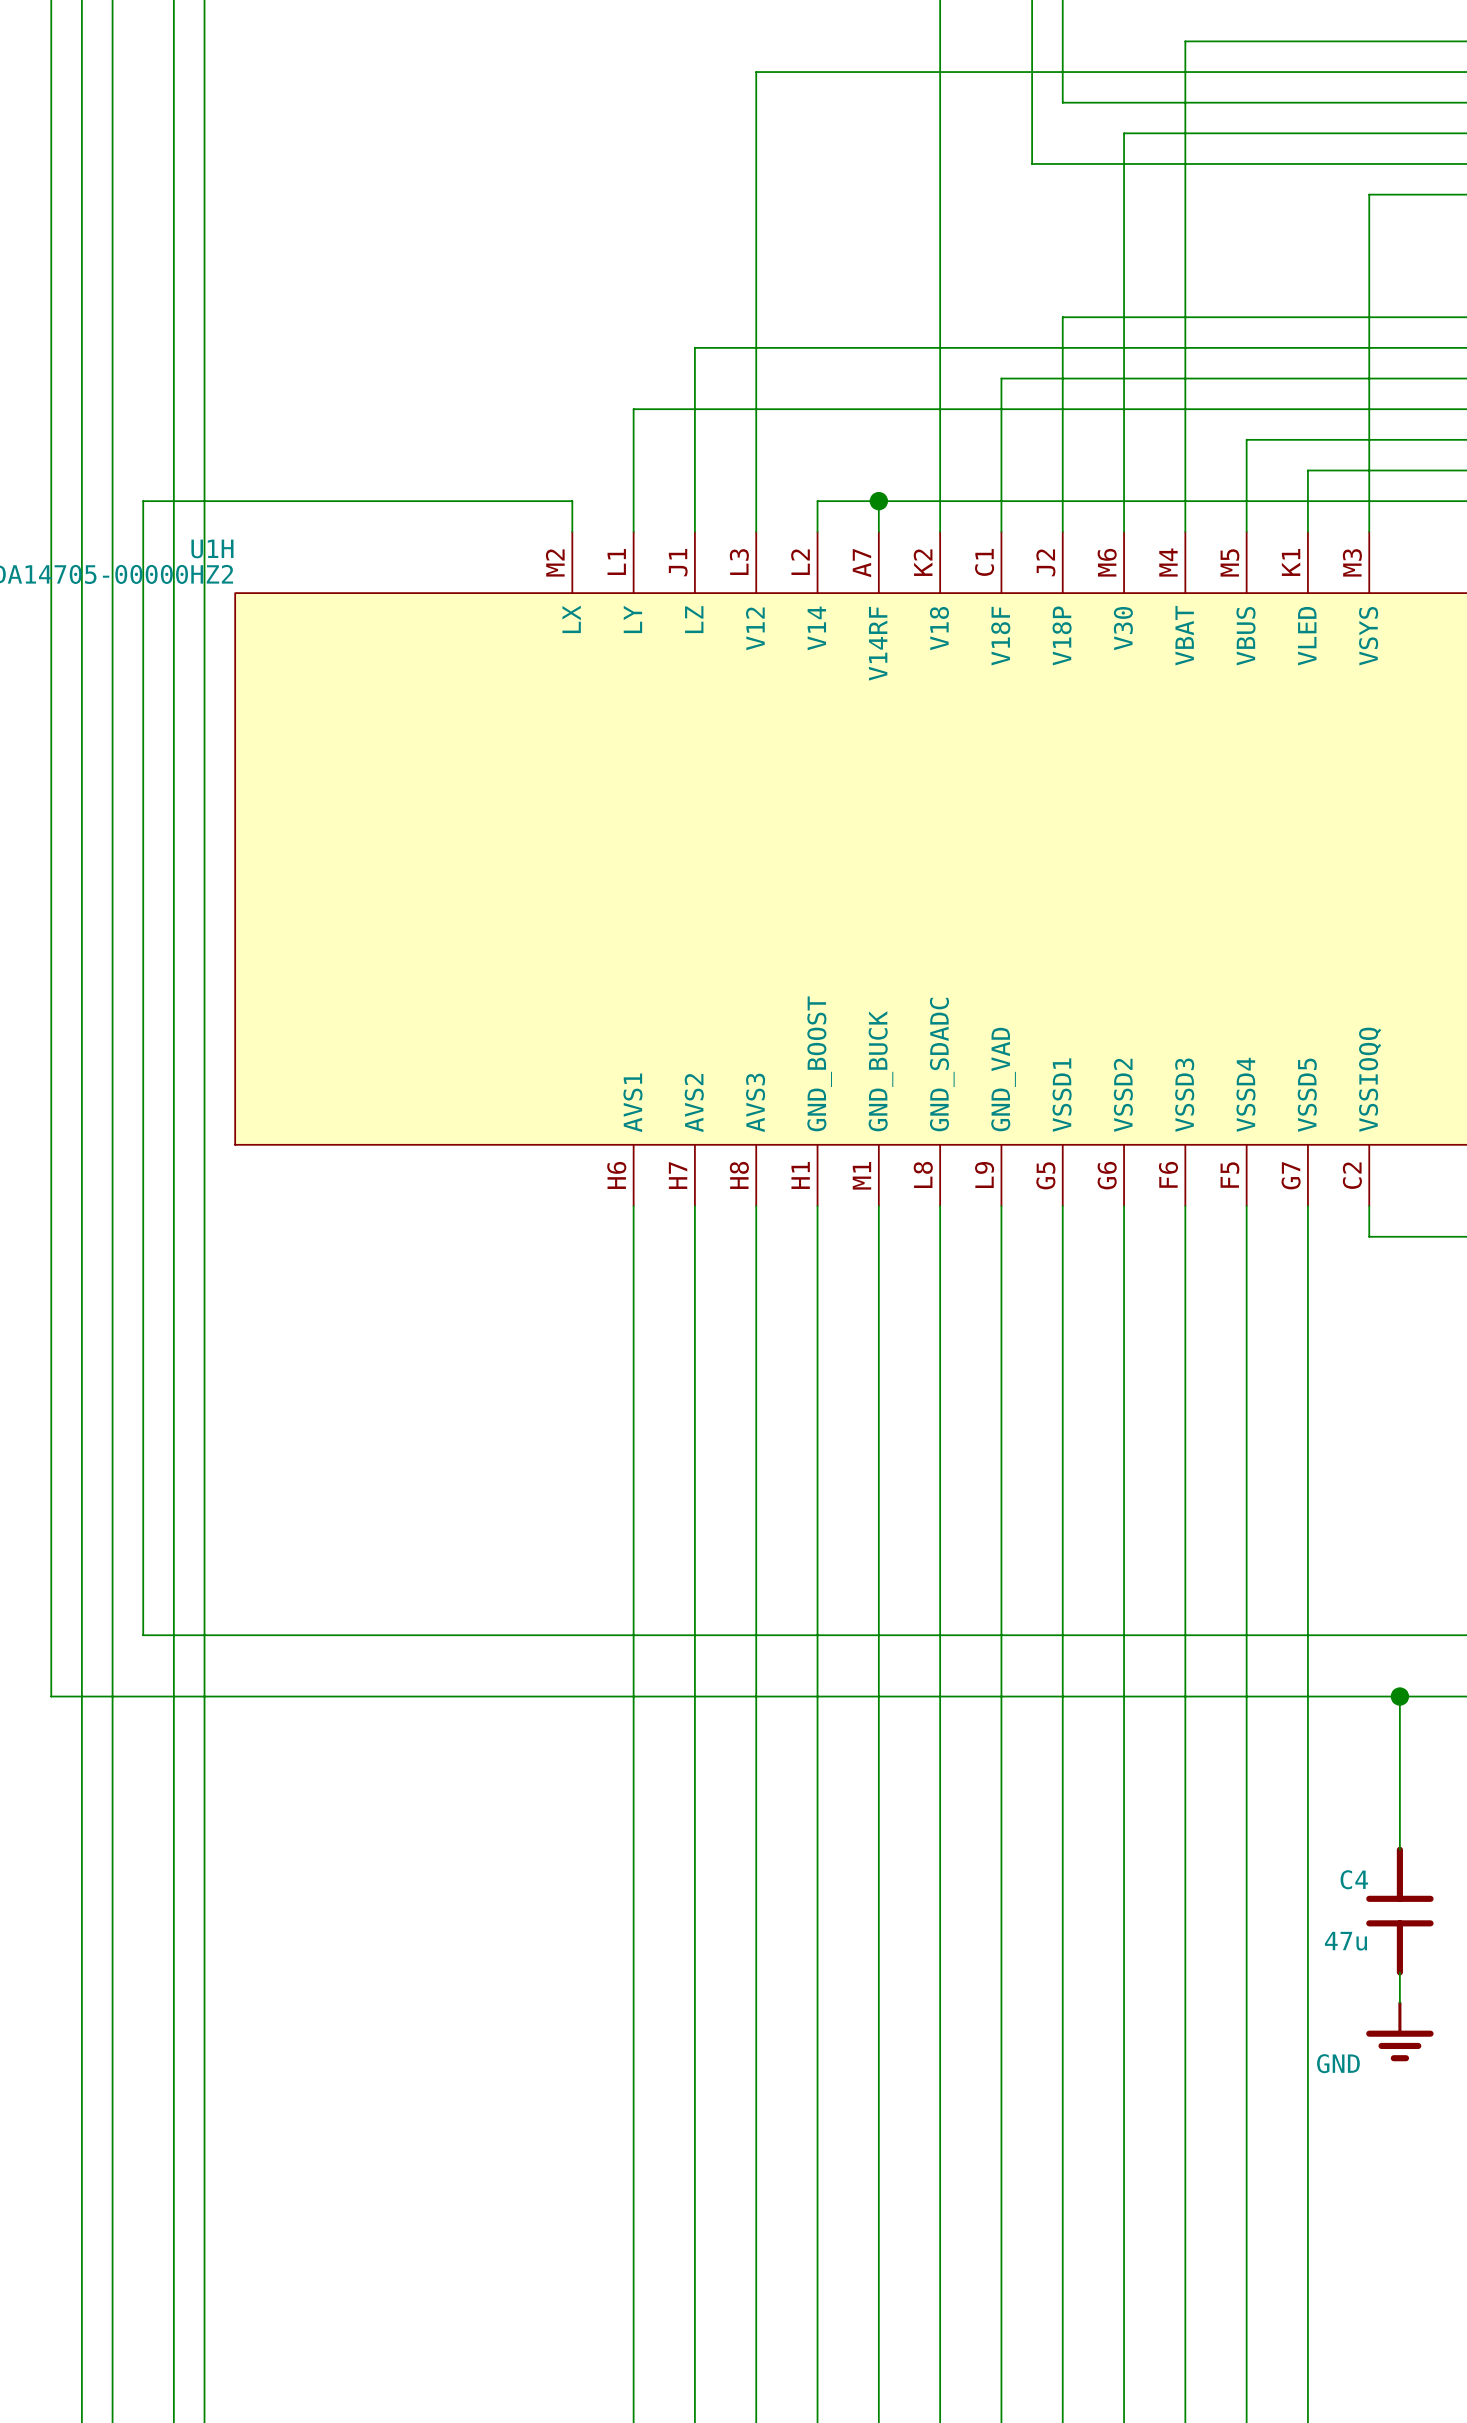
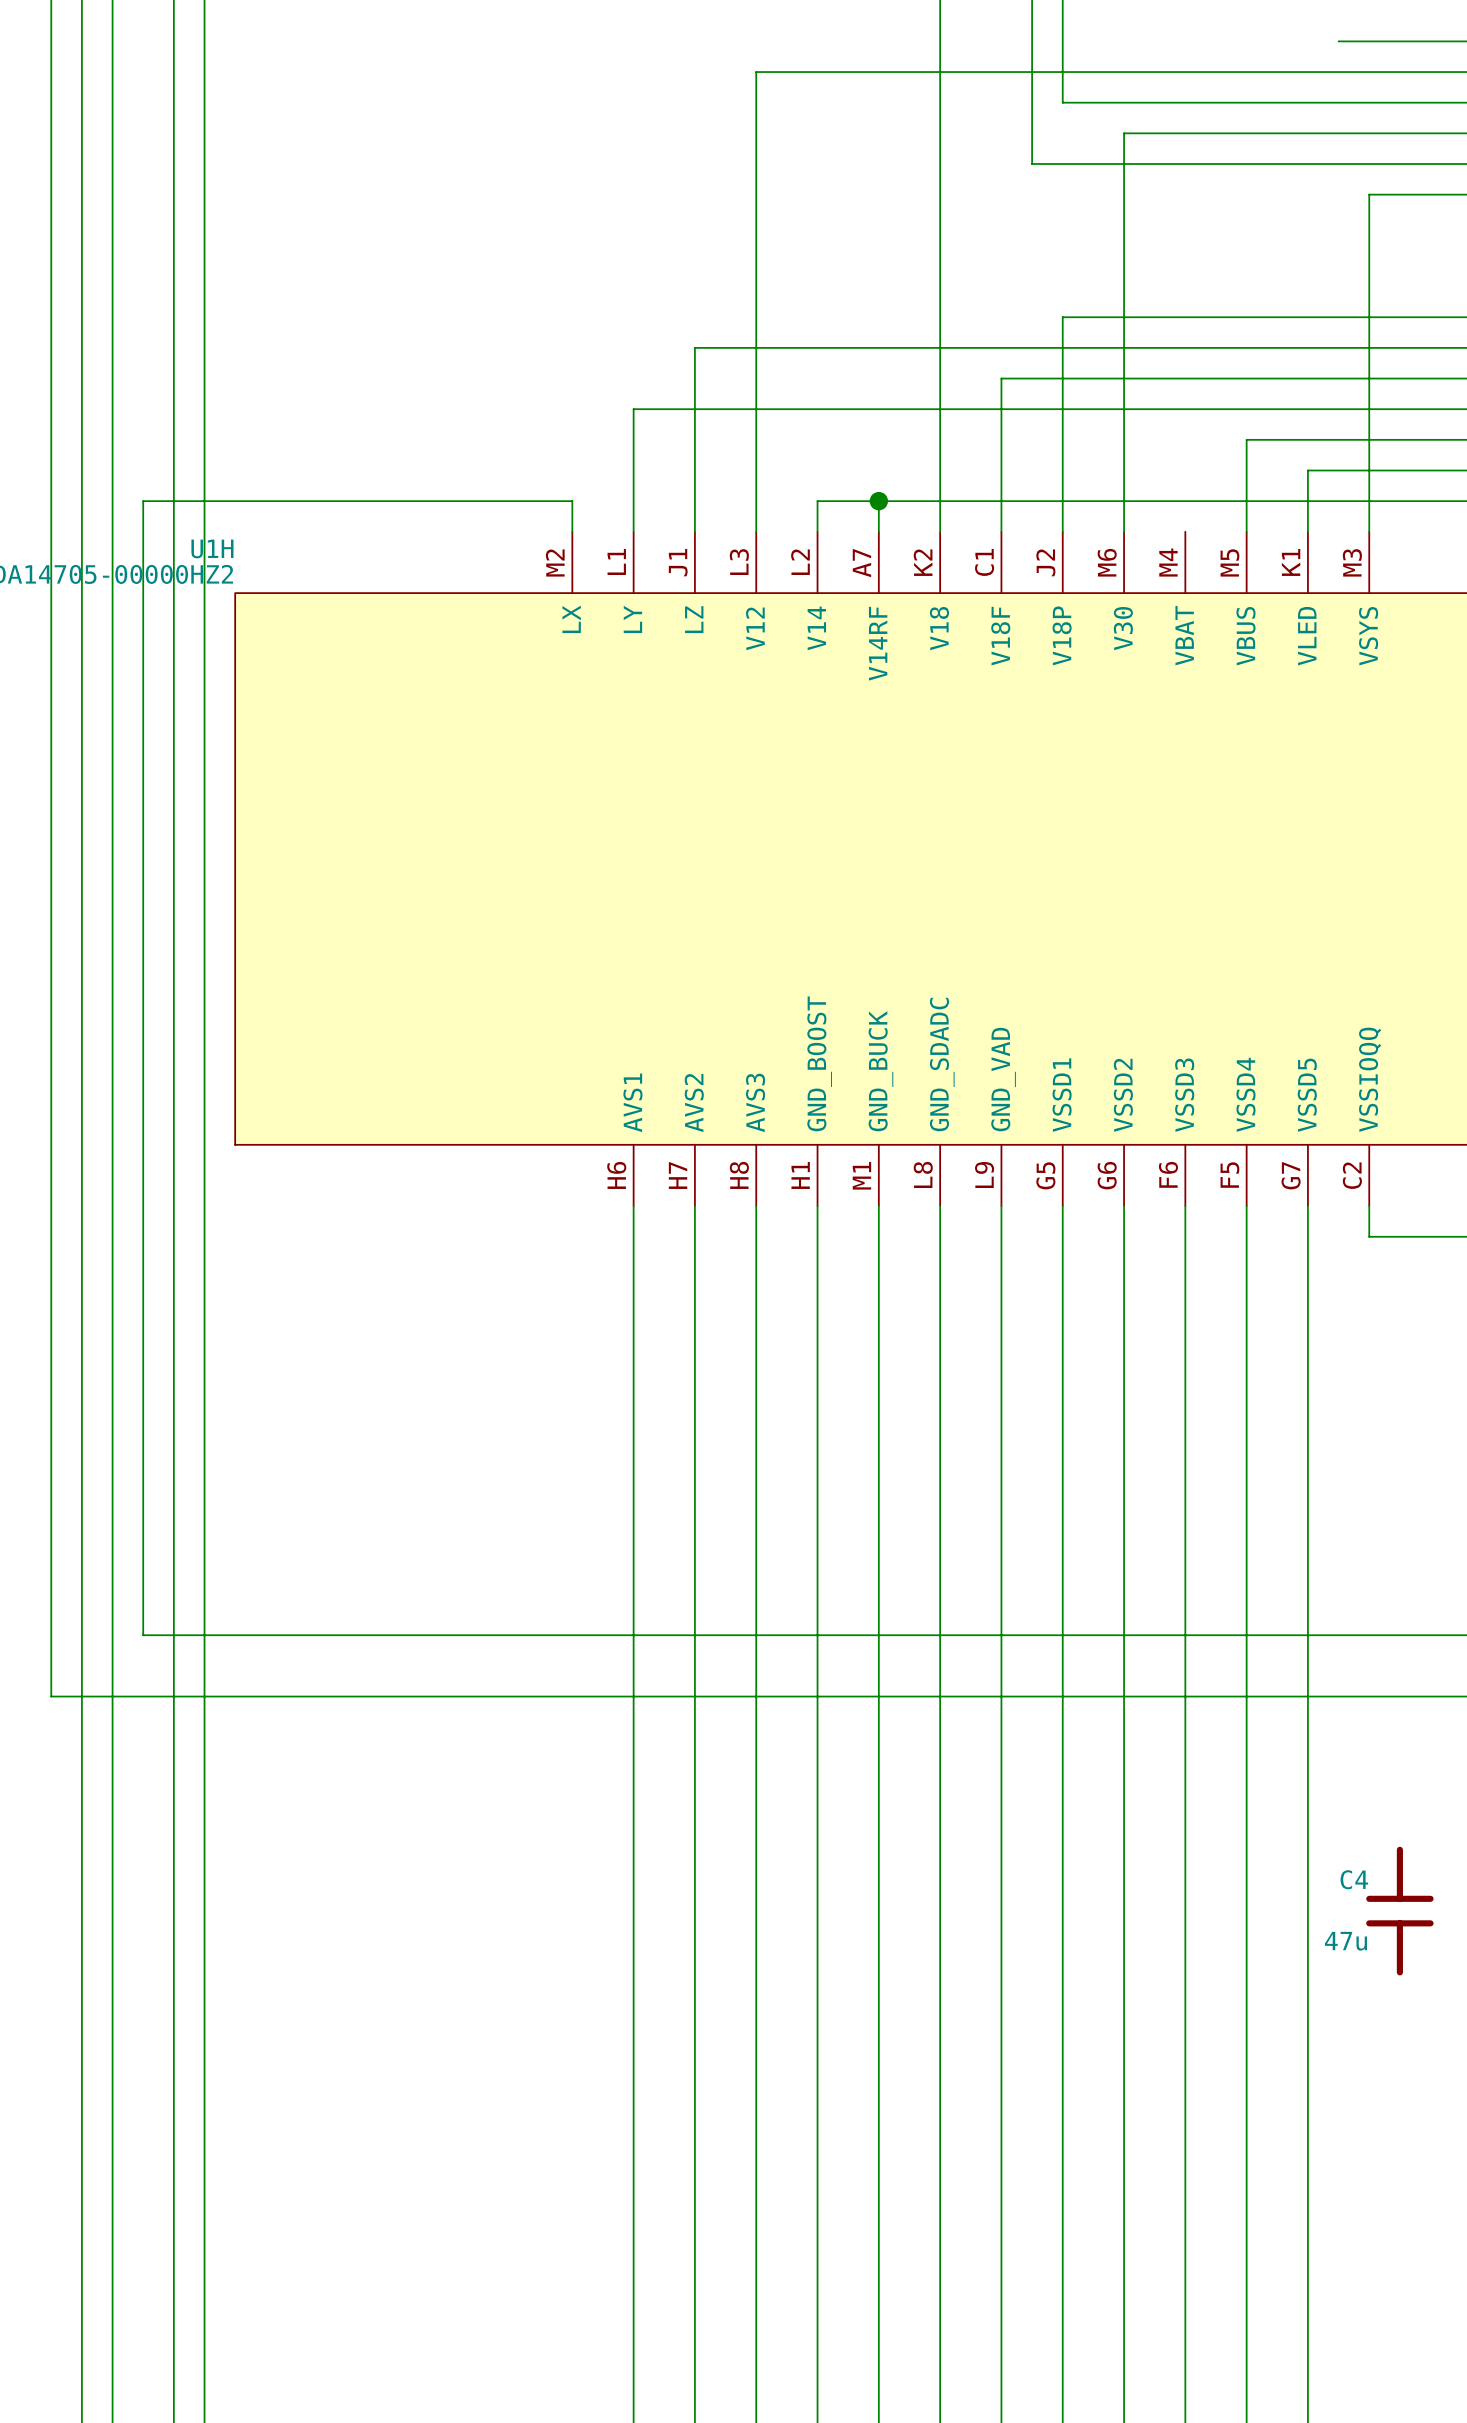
wire: (1338, 41) (1185, 41) (1185, 531) -> none
wire: (1399, 1696) (1399, 1849) -> none
junction: (1399, 1696) -> none
wire: (1399, 1972) (1399, 2003) -> none
power symbol: GND (1399, 2031) -> none

